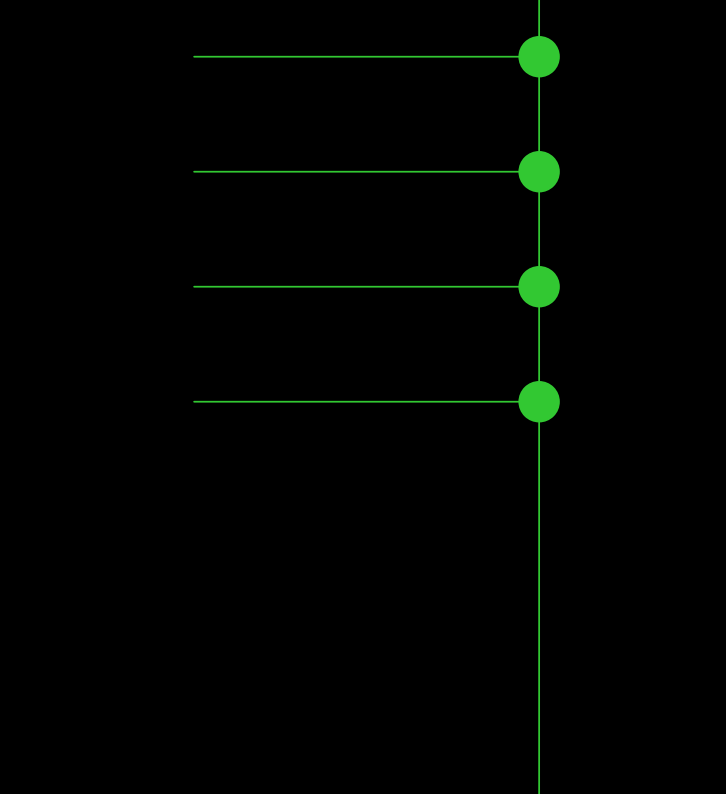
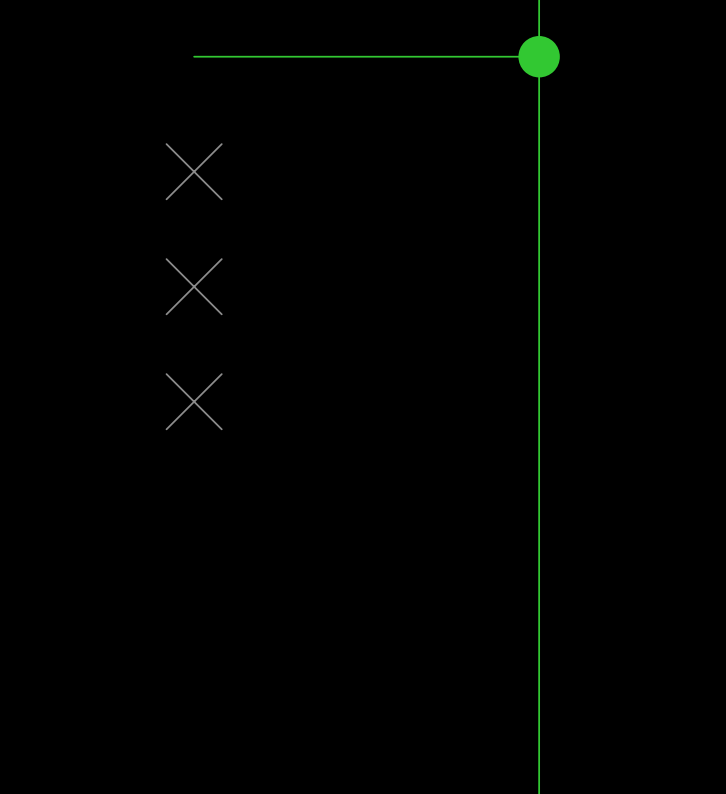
wire: (194, 171) (539, 171) -> none
no-connect mark: none -> (194, 171)
junction: (539, 171) -> none
wire: (194, 286) (539, 286) -> none
no-connect mark: none -> (194, 286)
junction: (539, 286) -> none
wire: (194, 401) (539, 401) -> none
no-connect mark: none -> (194, 401)
junction: (539, 401) -> none

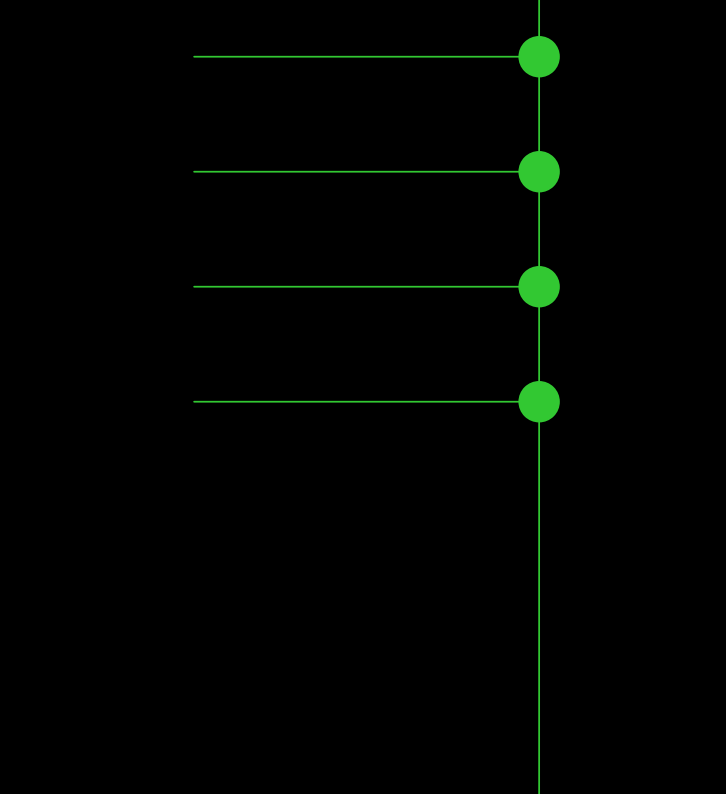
wire: none -> (194, 171) (539, 171)
no-connect mark: (194, 171) -> none
junction: none -> (539, 171)
wire: none -> (194, 286) (539, 286)
no-connect mark: (194, 286) -> none
junction: none -> (539, 286)
wire: none -> (194, 401) (539, 401)
no-connect mark: (194, 401) -> none
junction: none -> (539, 401)

